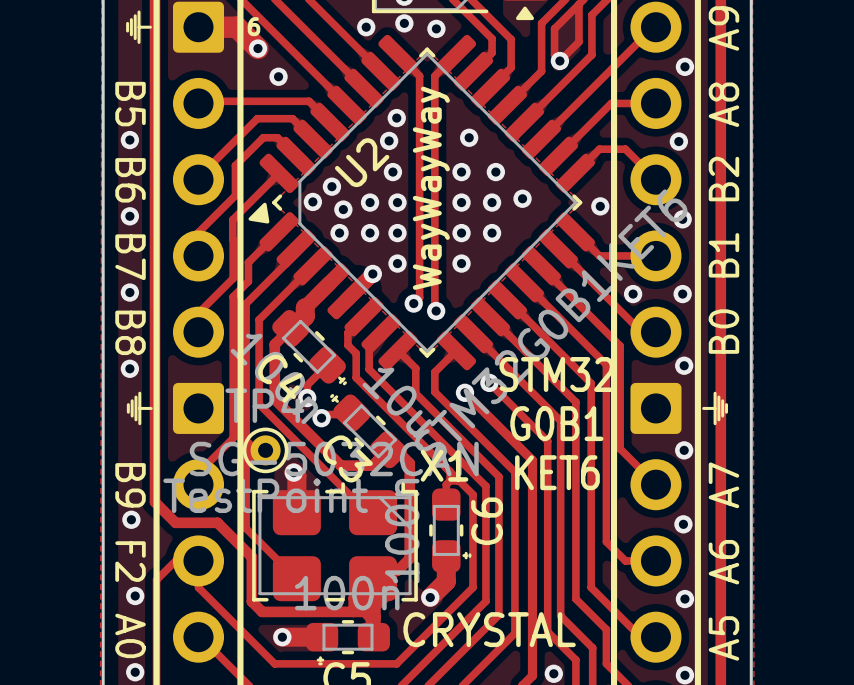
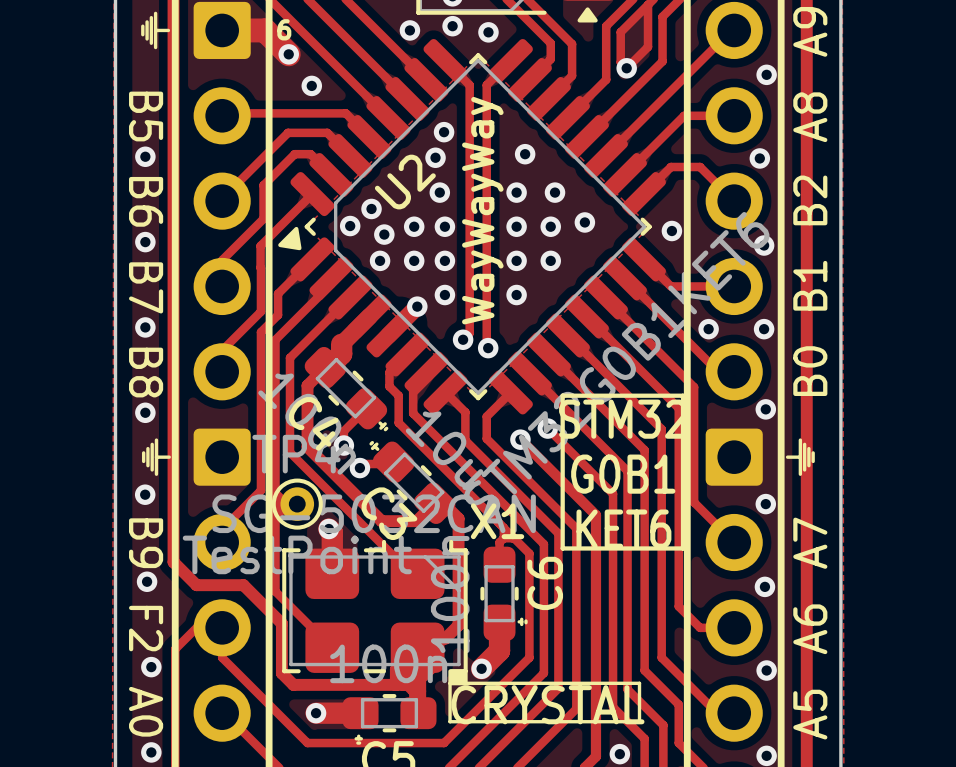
line: none -> (562, 395) (683, 395) (683, 548) (562, 548) (562, 395)
via: none -> (145, 494)
drawing: none -> [448, 669, 468, 686]
line: none -> (450, 683) (639, 683) (639, 721) (450, 721) (450, 683)

